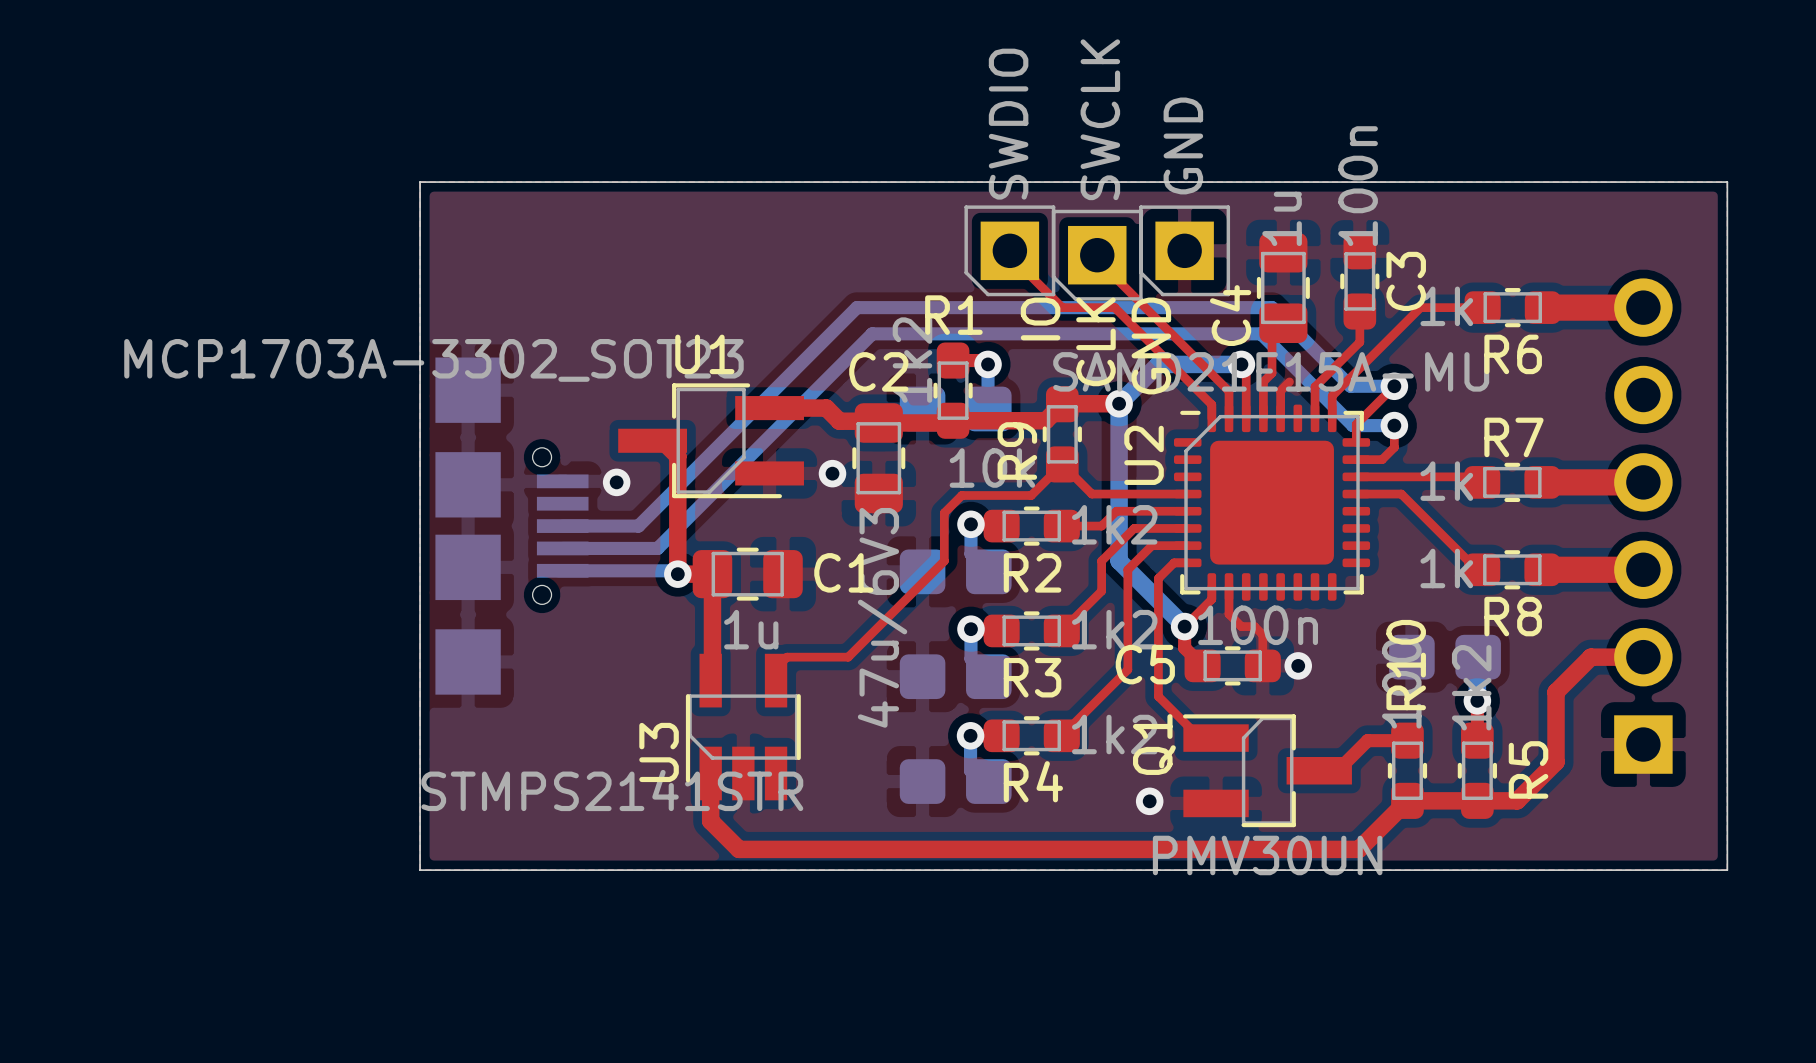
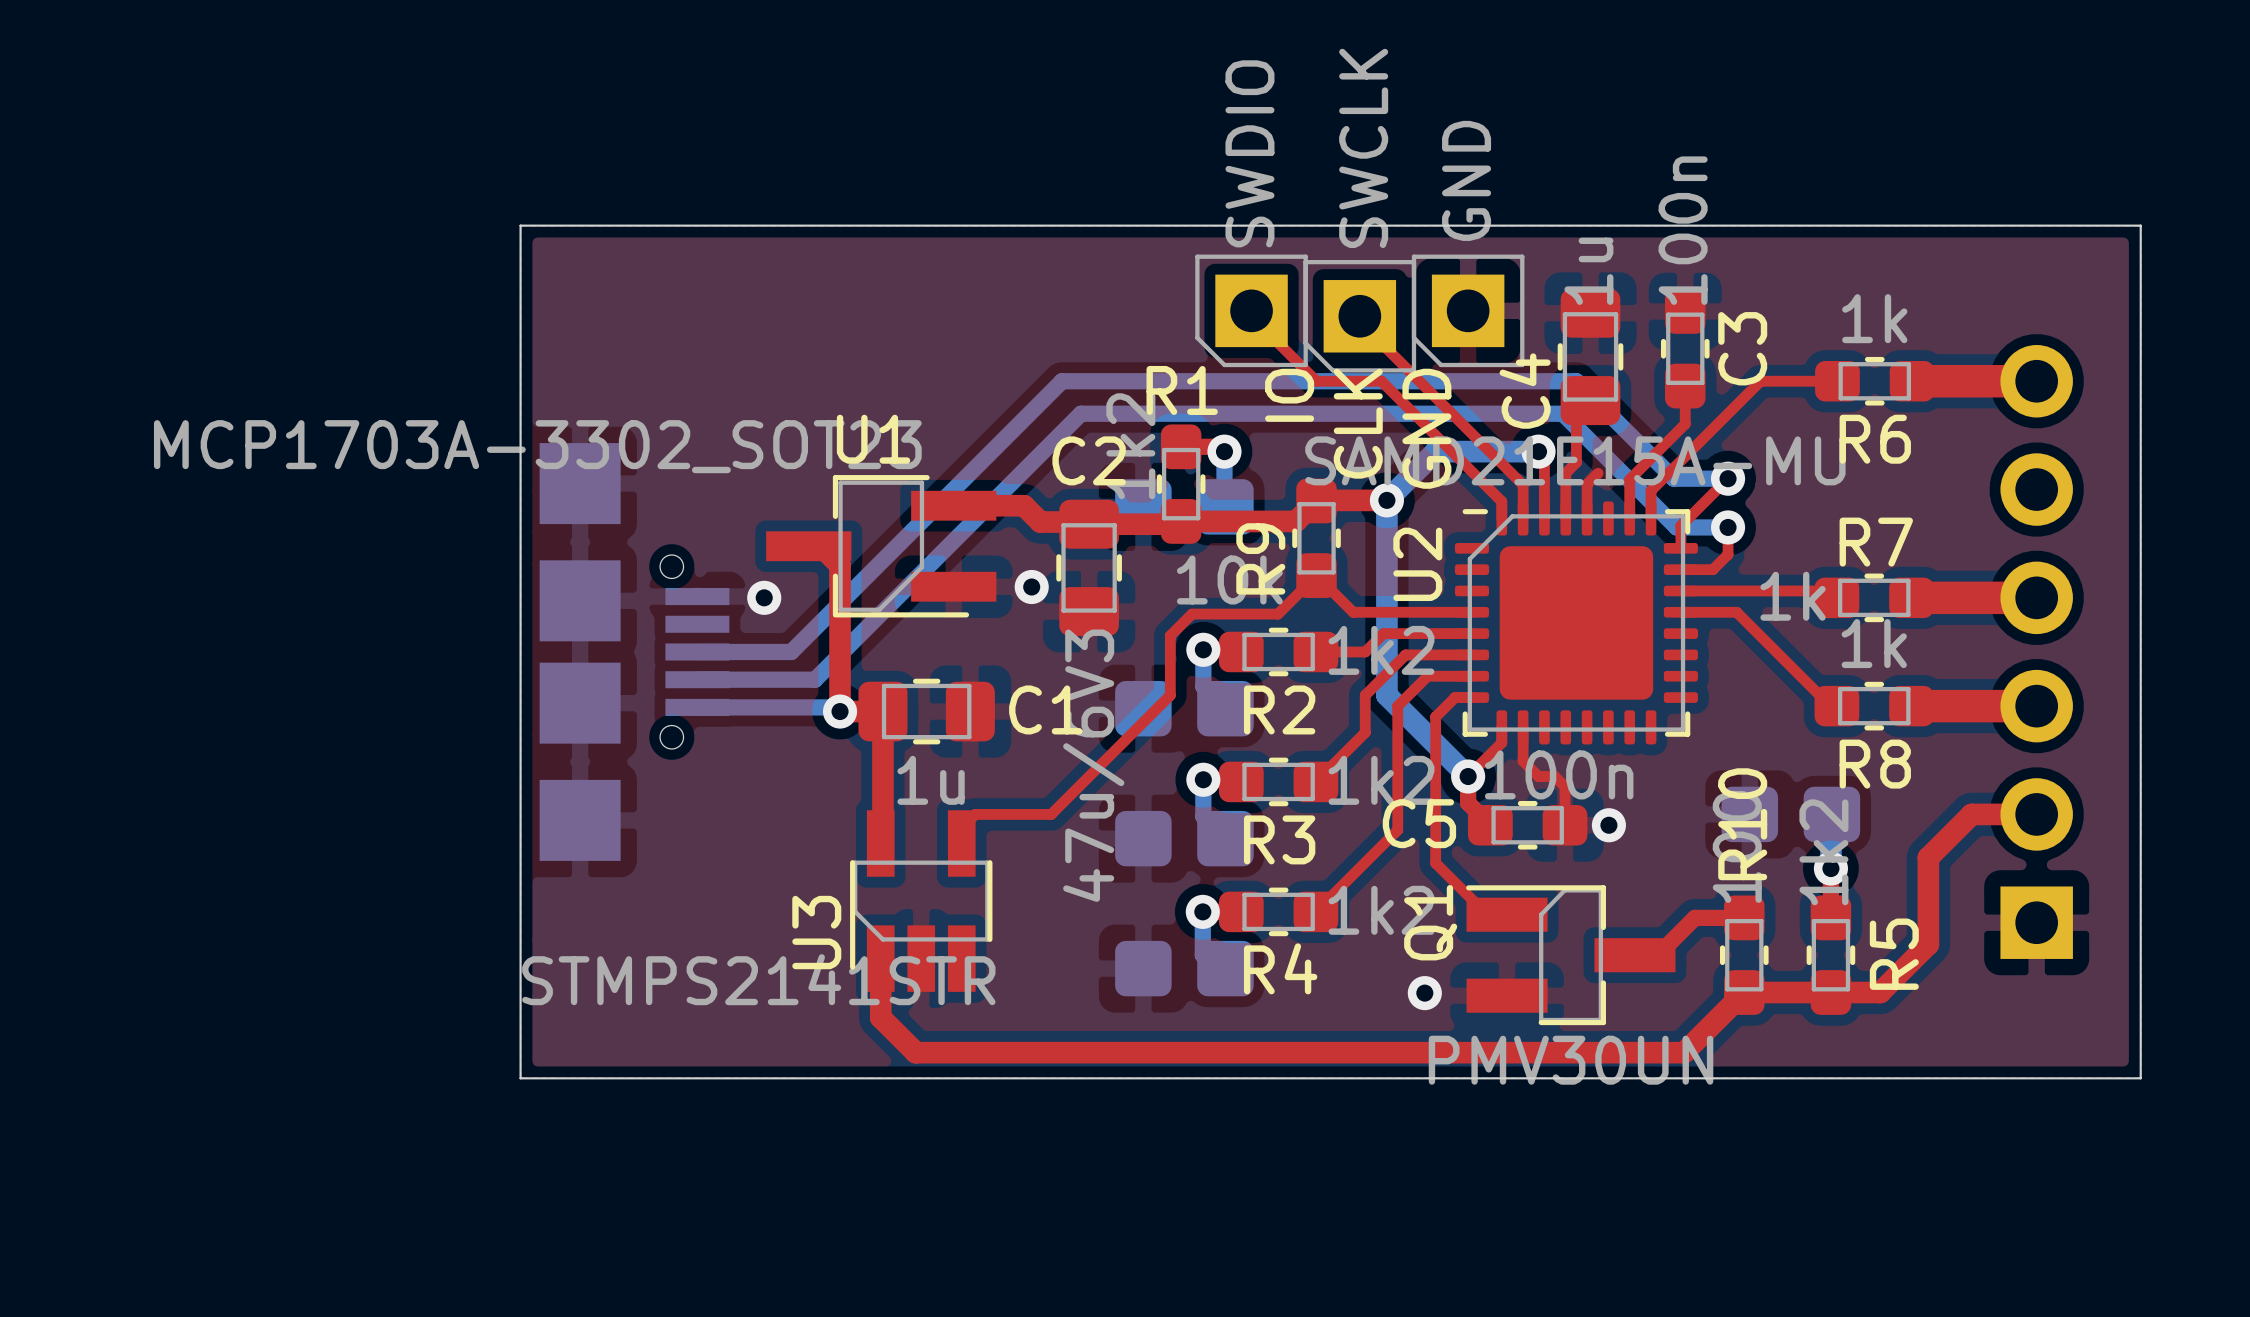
R6 value position: 1k (1446, 306) -> 1k (1874, 318)
R8 value position: 1k (1446, 568) -> 1k (1874, 643)

